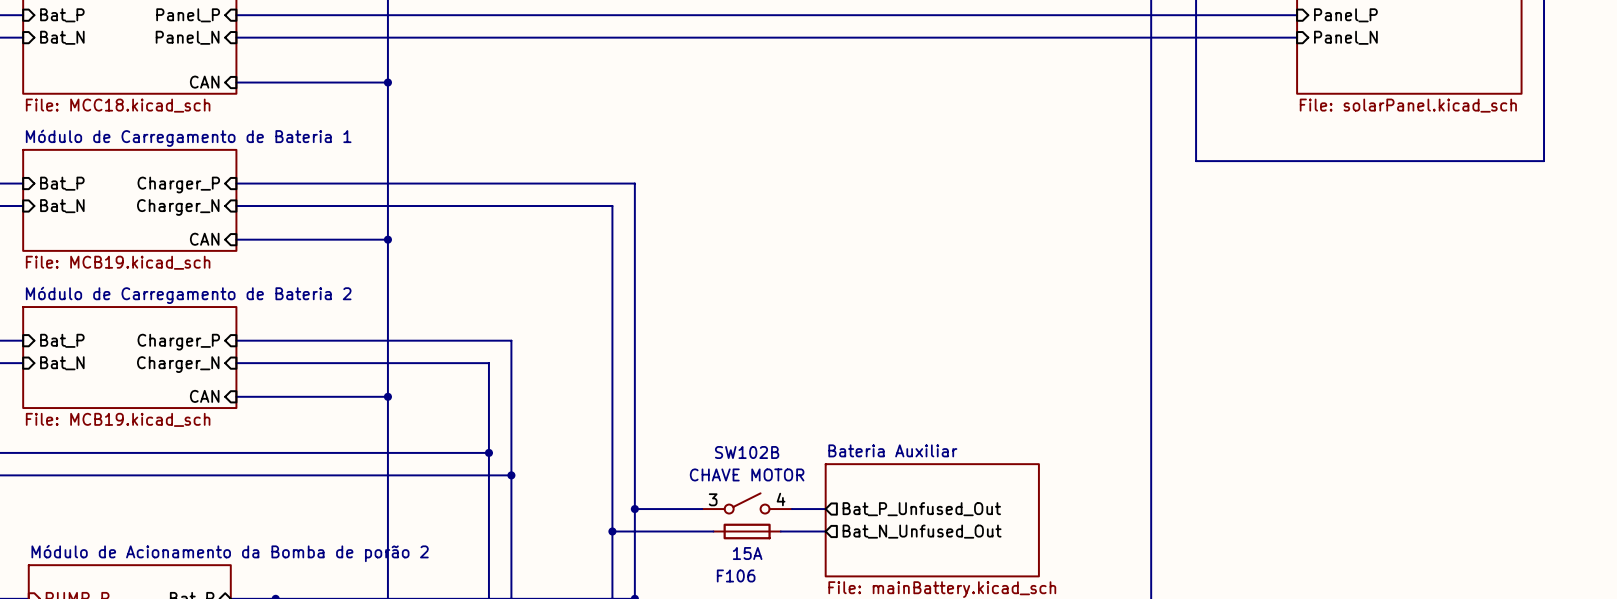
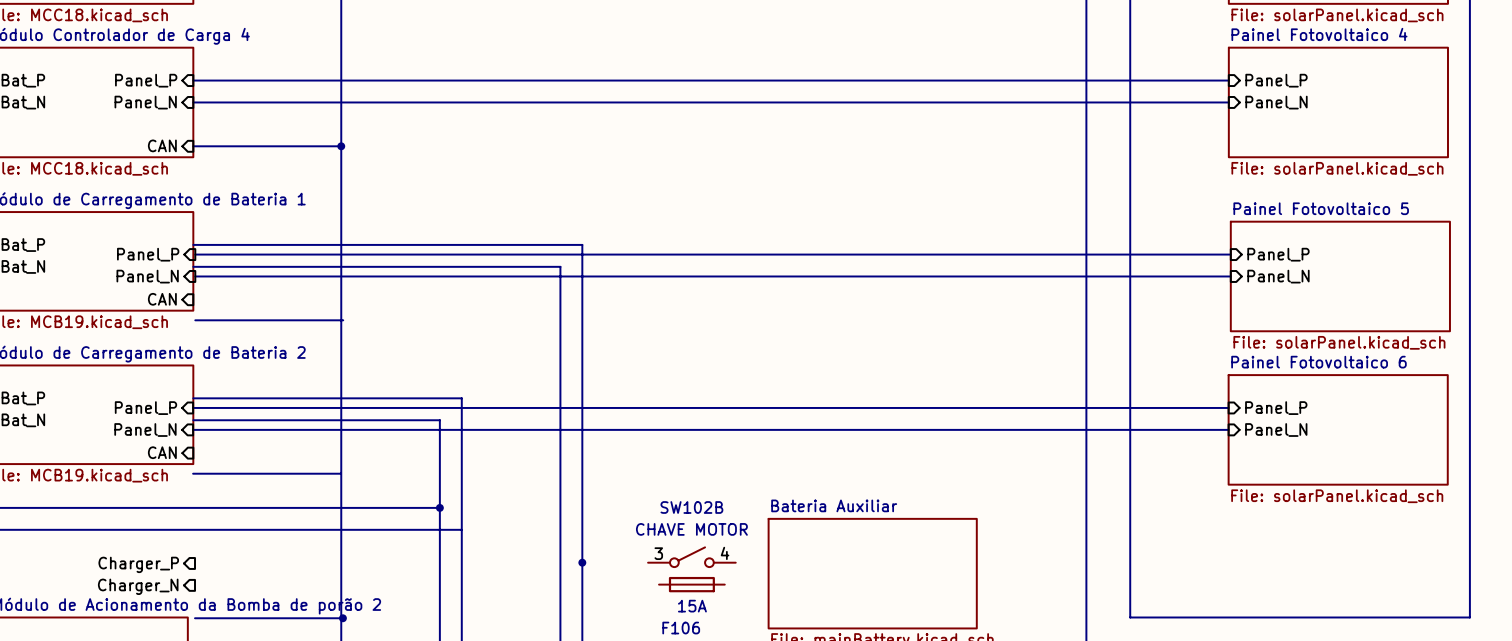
line: (1196, 161) (1544, 161) -> (1130, 223) (1130, 617) (1469, 617) (1469, 223)
sheet pin: Charger_P (178, 185) -> none
sheet pin: none -> Panel_P (148, 254)
wire: none -> (195, 254) (1230, 254)
sheet pin: none -> Panel_P (1278, 254)
sheet pin: Charger_N (178, 207) -> none
sheet pin: none -> Panel_N (147, 276)
wire: none -> (195, 276) (1230, 276)
sheet pin: none -> Panel_N (1278, 276)
sheet Painel Fotovoltaico 5: none -> File: solarPanel.kicad_sch (1340, 276)
bus: (236, 239) (387, 239) -> (195, 320) (343, 320)
junction: (387, 239) -> none
sheet pin: Charger_P (178, 342) -> none
sheet pin: none -> Panel_P (145, 408)
wire: none -> (193, 407) (1228, 407)
sheet pin: none -> Panel_P (1276, 408)
sheet pin: Charger_N (178, 364) -> none
sheet pin: none -> Panel_N (145, 430)
wire: none -> (193, 429) (1228, 429)
sheet pin: none -> Panel_N (1276, 430)
sheet Painel Fotovoltaico 6: none -> File: solarPanel.kicad_sch (1338, 429)
bus: (236, 396) (387, 396) -> (193, 473) (341, 473)
junction: (387, 396) -> none
junction: (511, 475) -> none
wire: (634, 509) (702, 509) -> none
wire: (792, 509) (825, 509) -> none
sheet pin: Bat_P_Unfused_Out (921, 509) -> none
sheet pin: none -> Charger_P (138, 564)
wire: (612, 531) (713, 531) -> none
junction: (612, 531) -> none
wire: (780, 531) (825, 531) -> none
sheet pin: Bat_N_Unfused_Out (922, 531) -> none
sheet pin: none -> Charger_N (138, 586)
bus: none -> (195, 618) (342, 618)
junction: none -> (342, 618)

